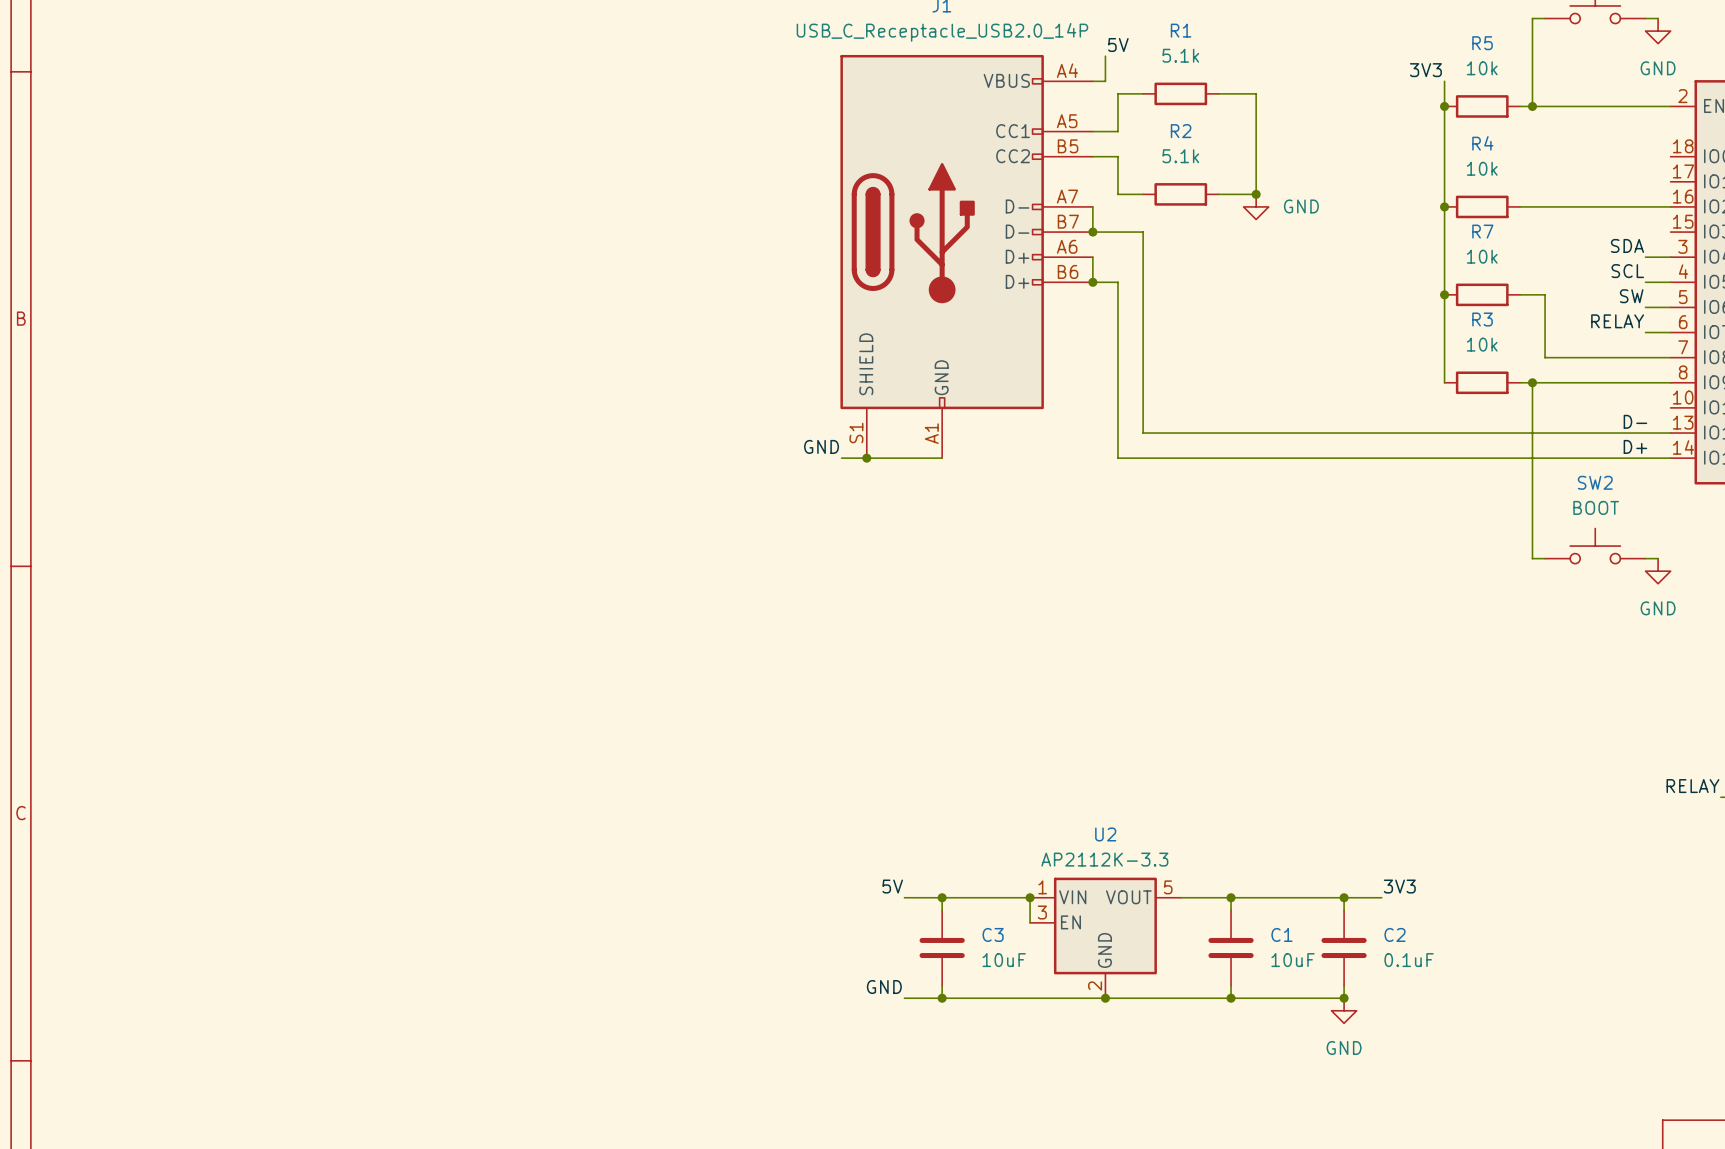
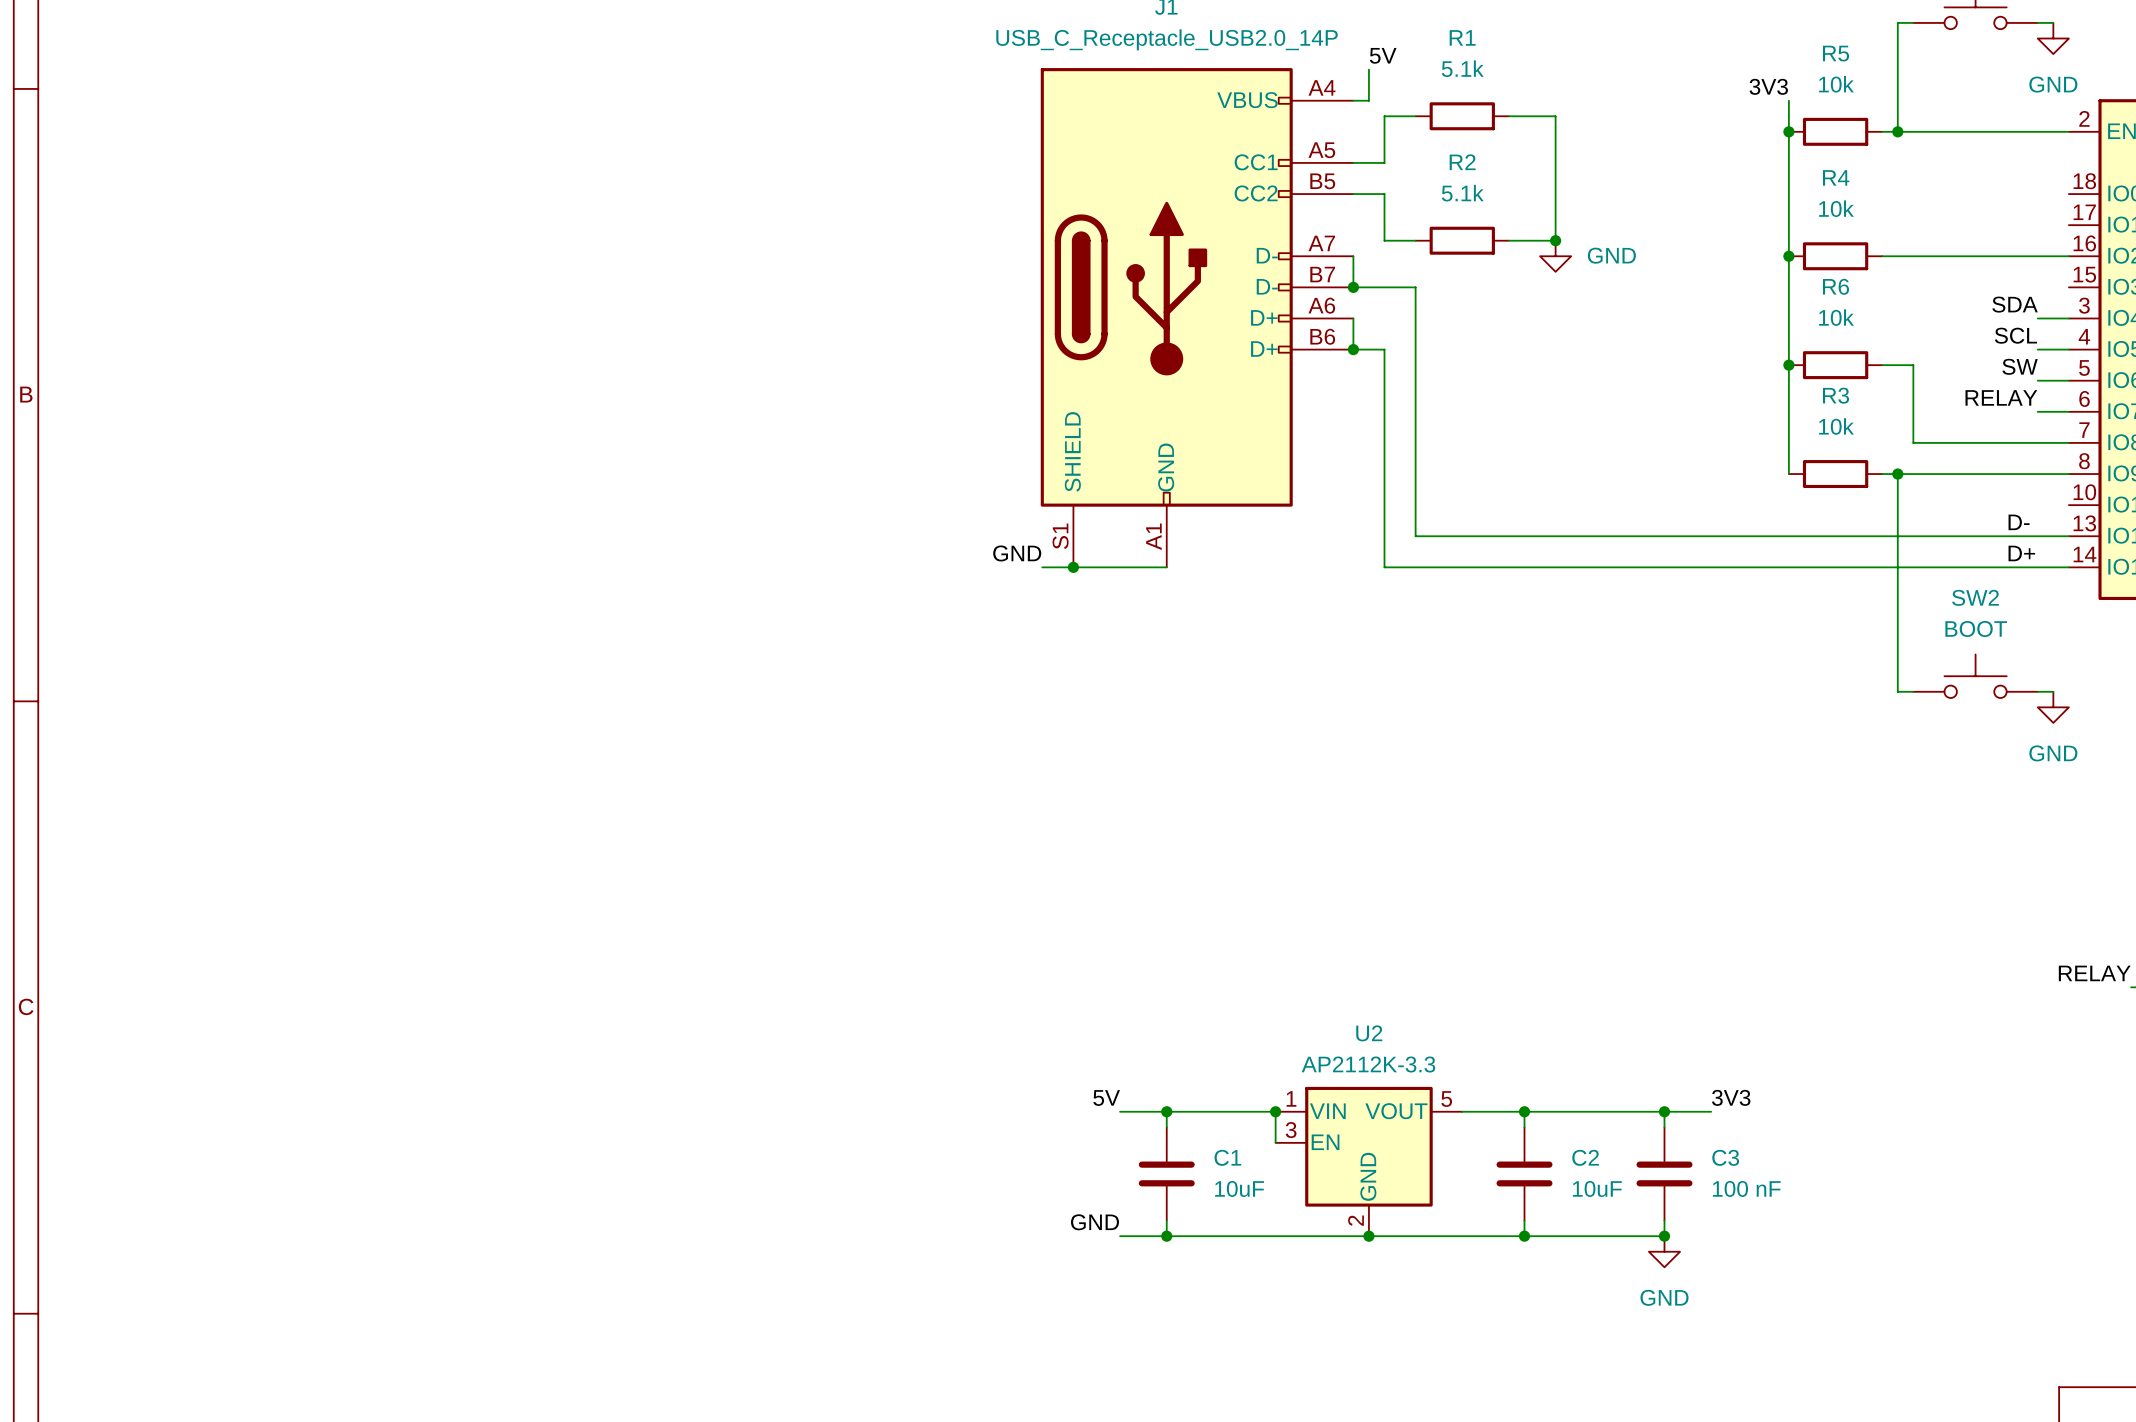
R7 name: R7 (1482, 231) -> R6 (1836, 286)
C3 name: C3 (993, 934) -> C1 (1227, 1157)
C1 name: C1 (1281, 934) -> C2 (1585, 1157)
C2 name: C2 (1395, 934) -> C3 (1725, 1157)
C2 value: 0.1uF (1409, 960) -> 100 nF (1746, 1188)

